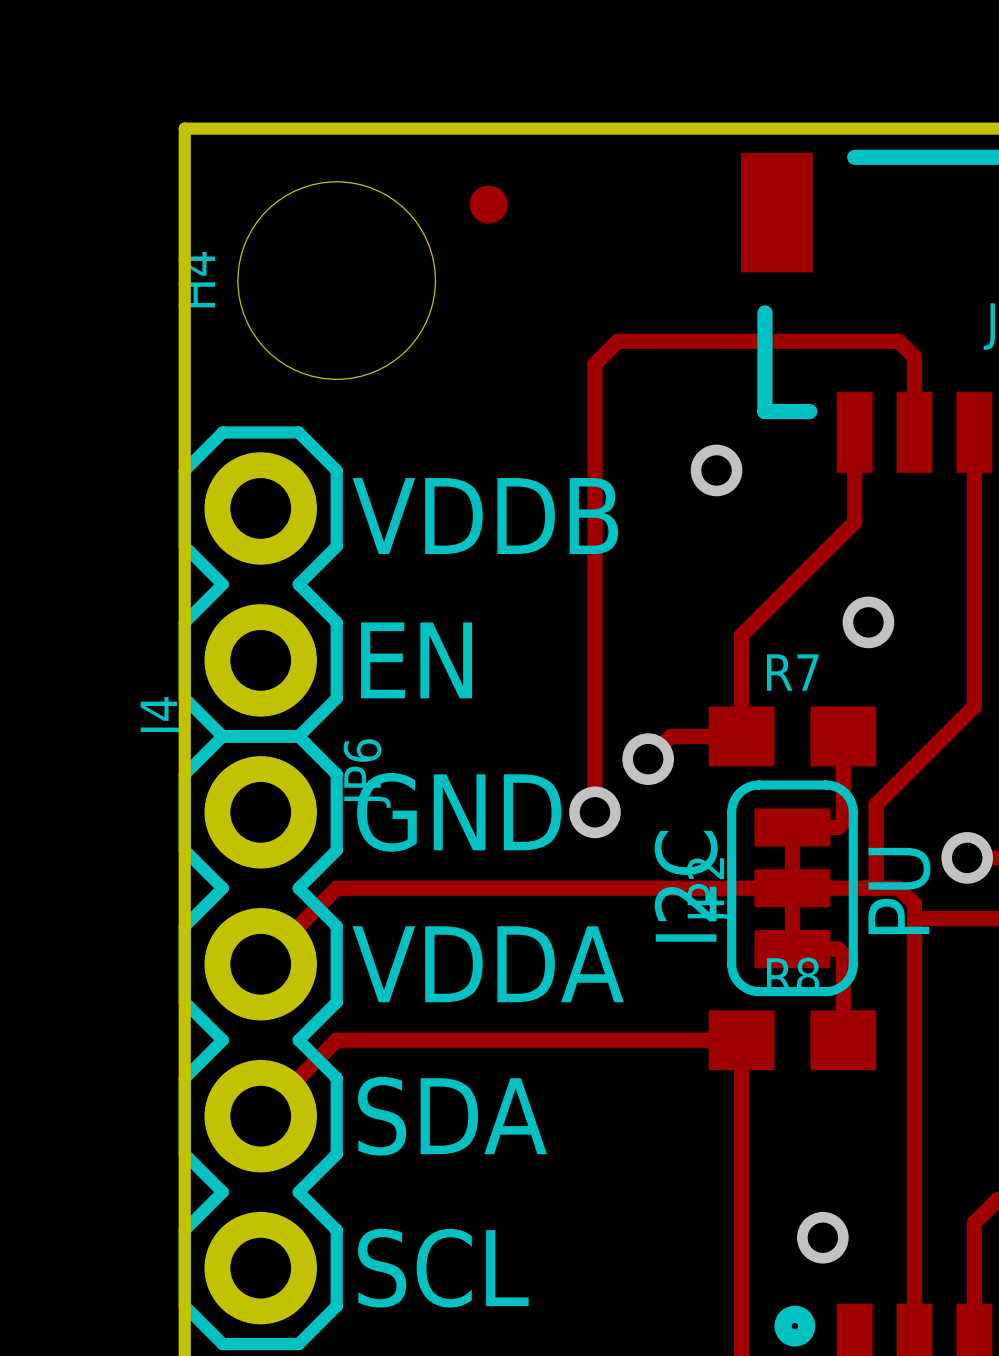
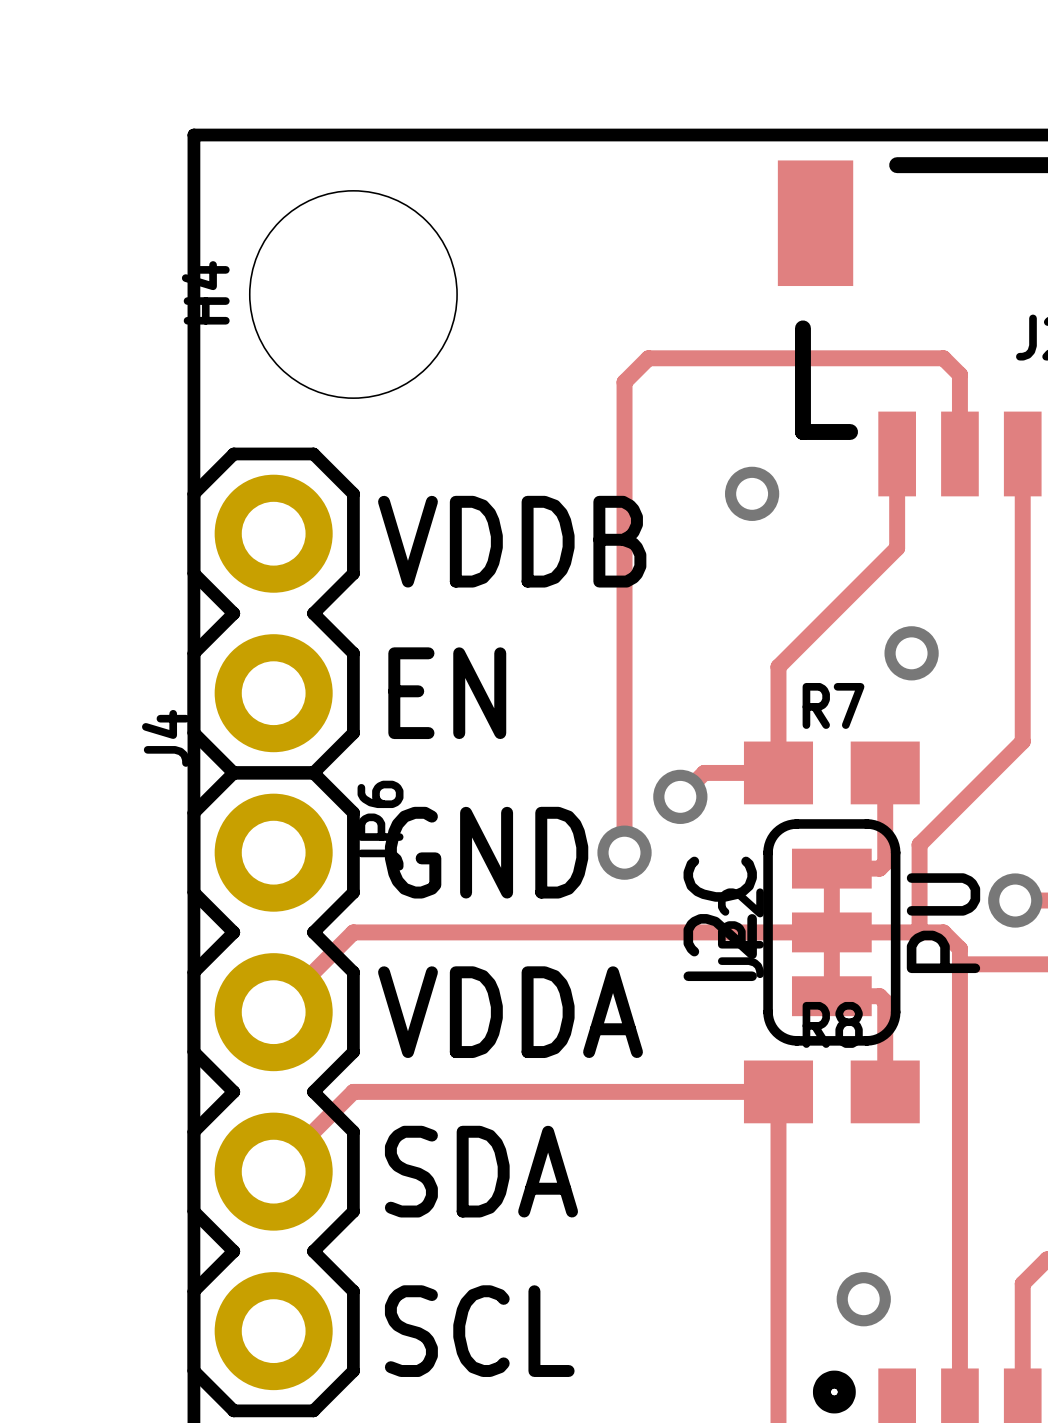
part: (488, 204) -> none

